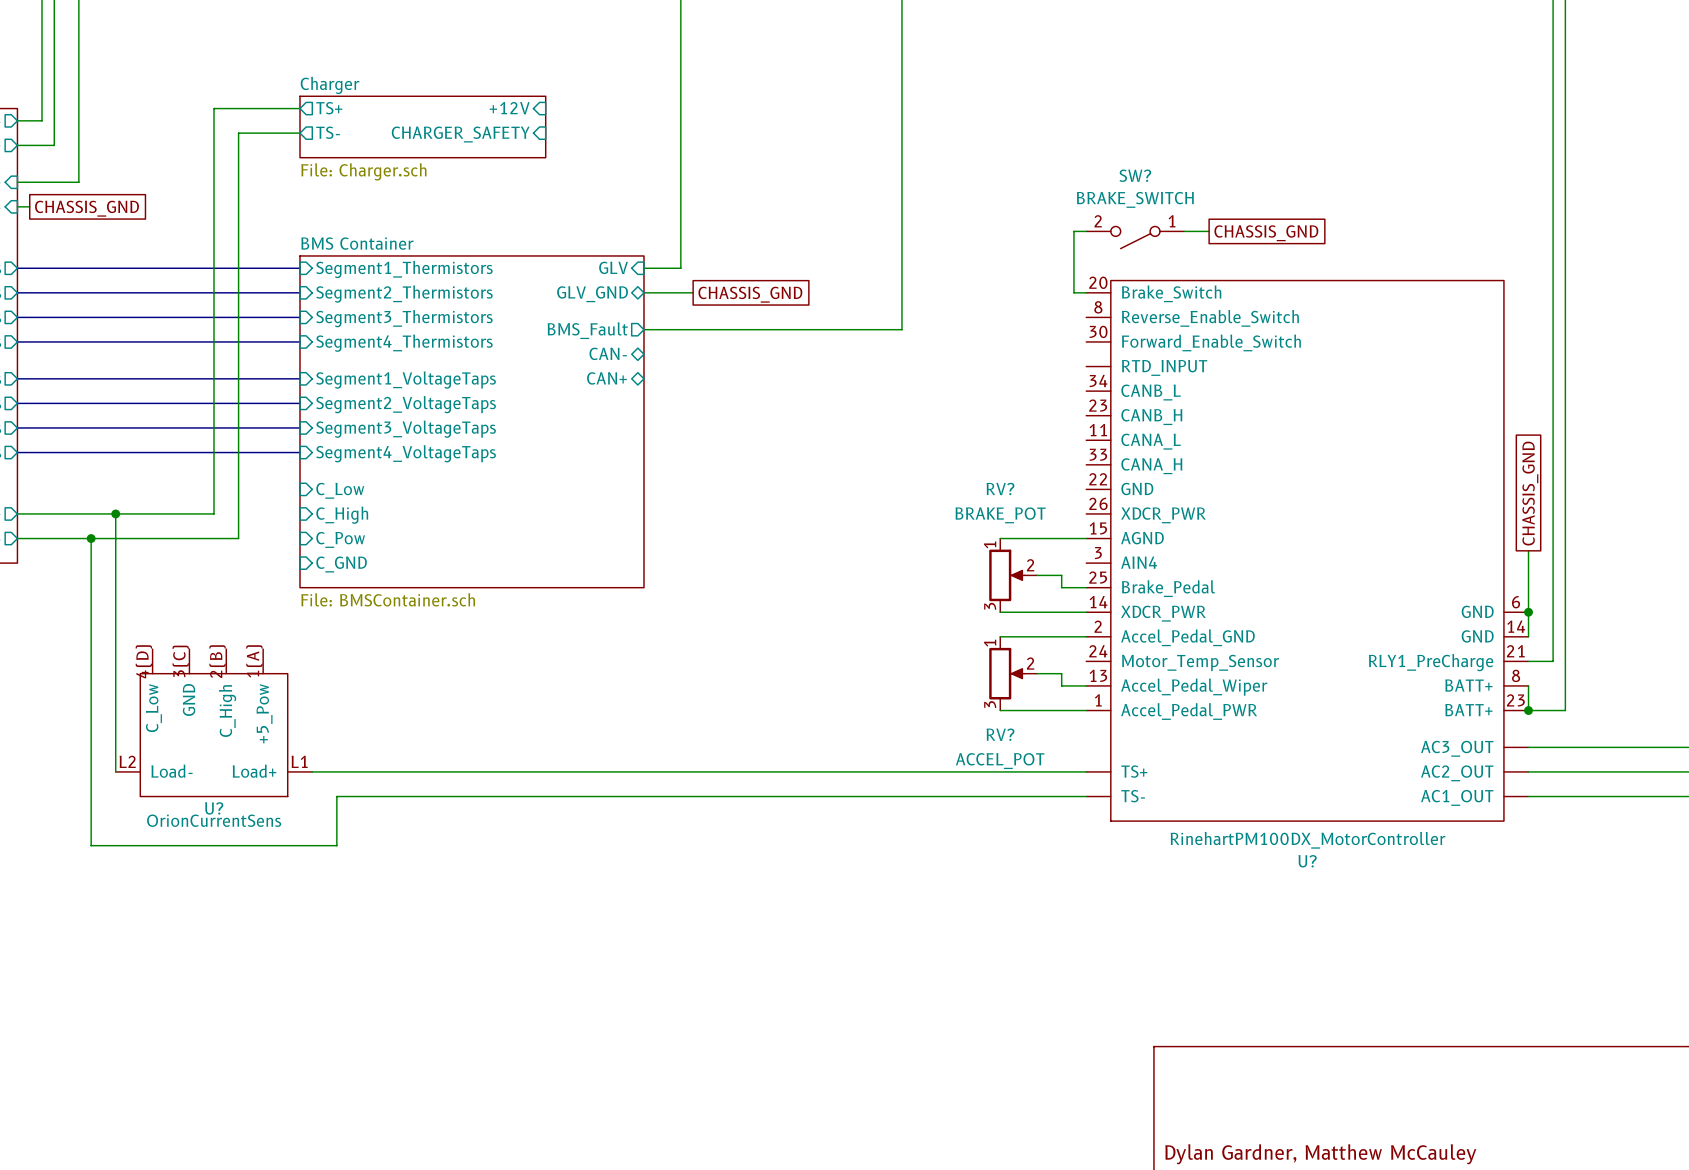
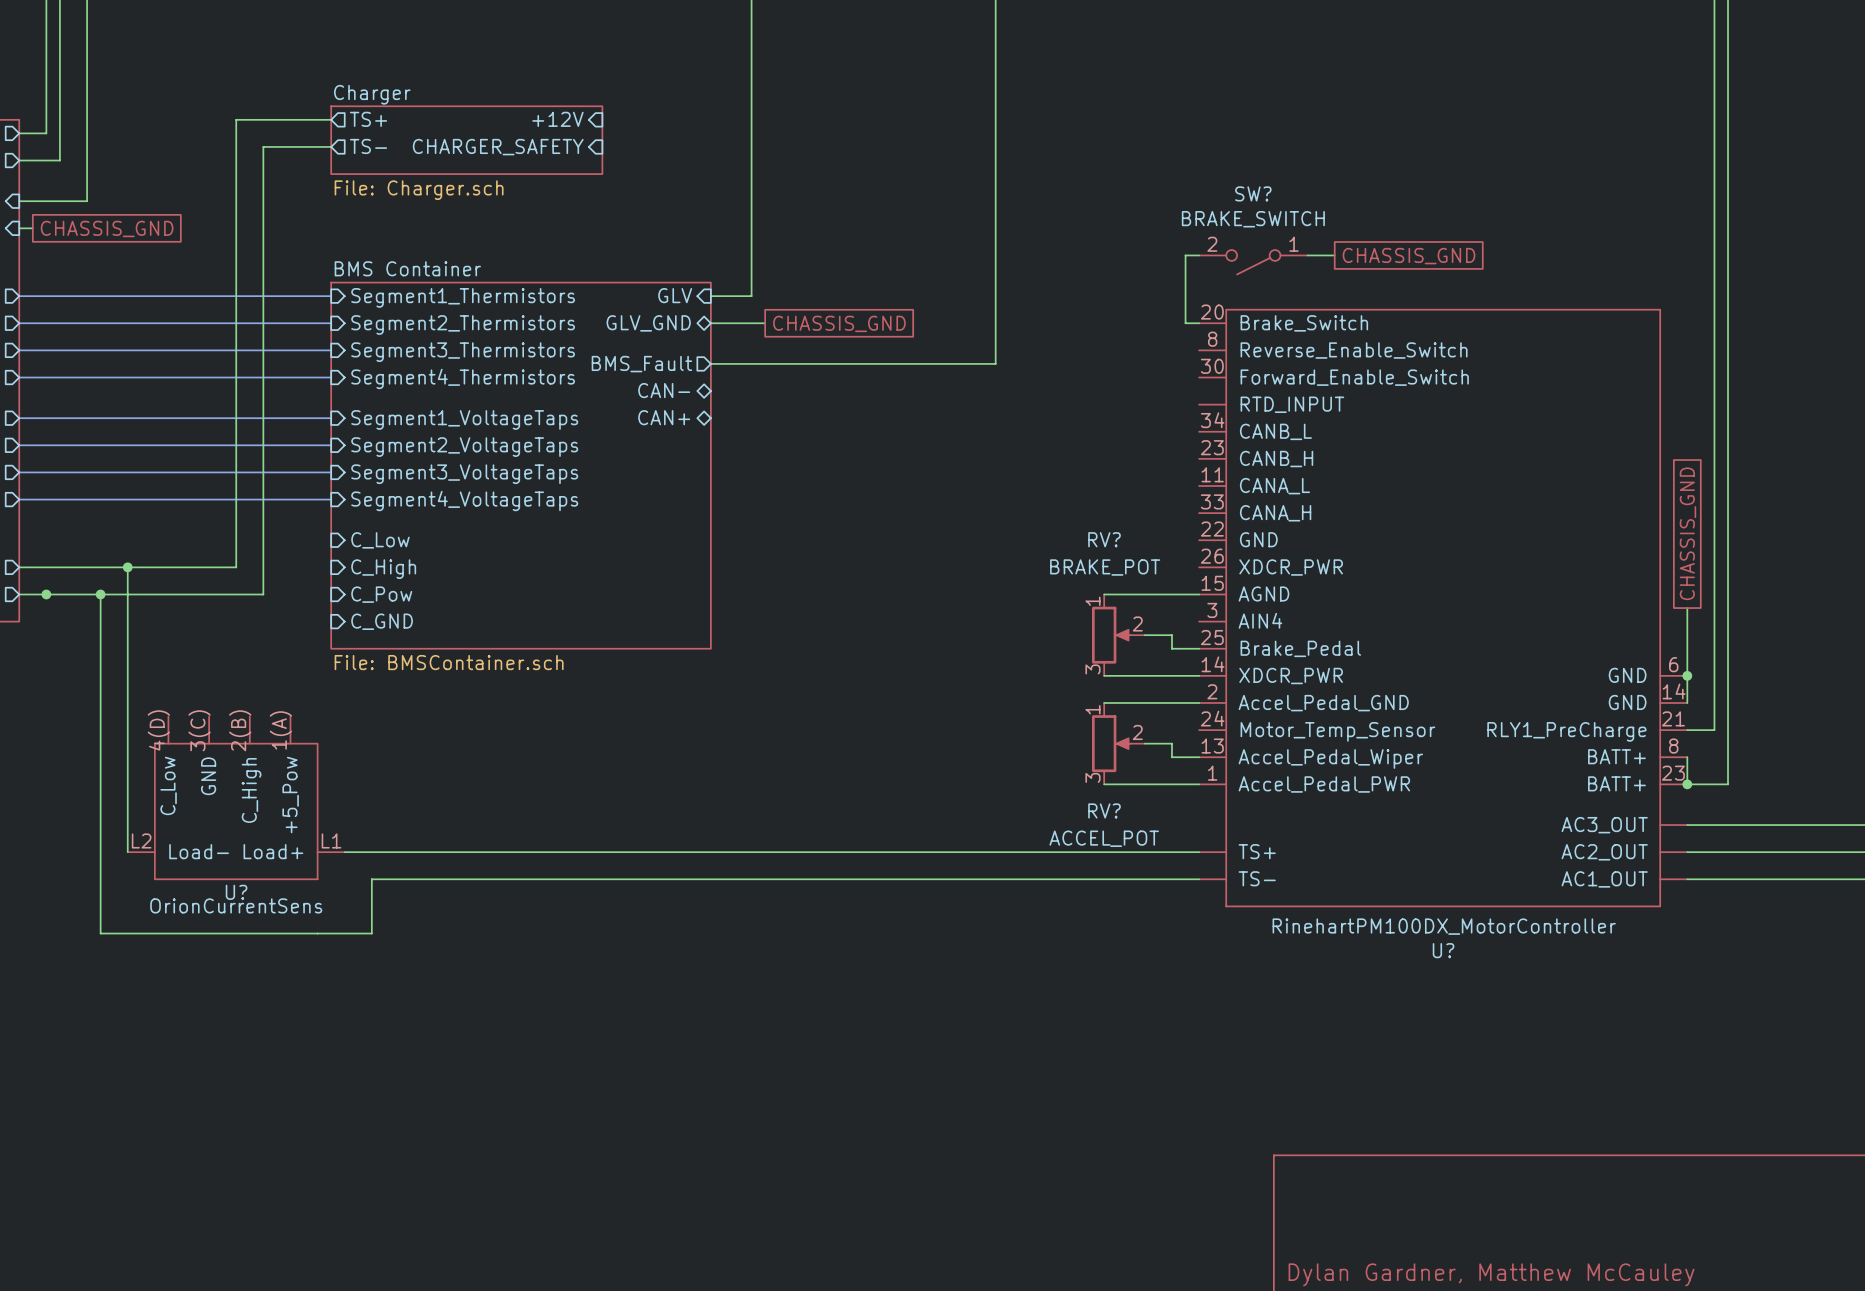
junction: none -> (46, 594)

